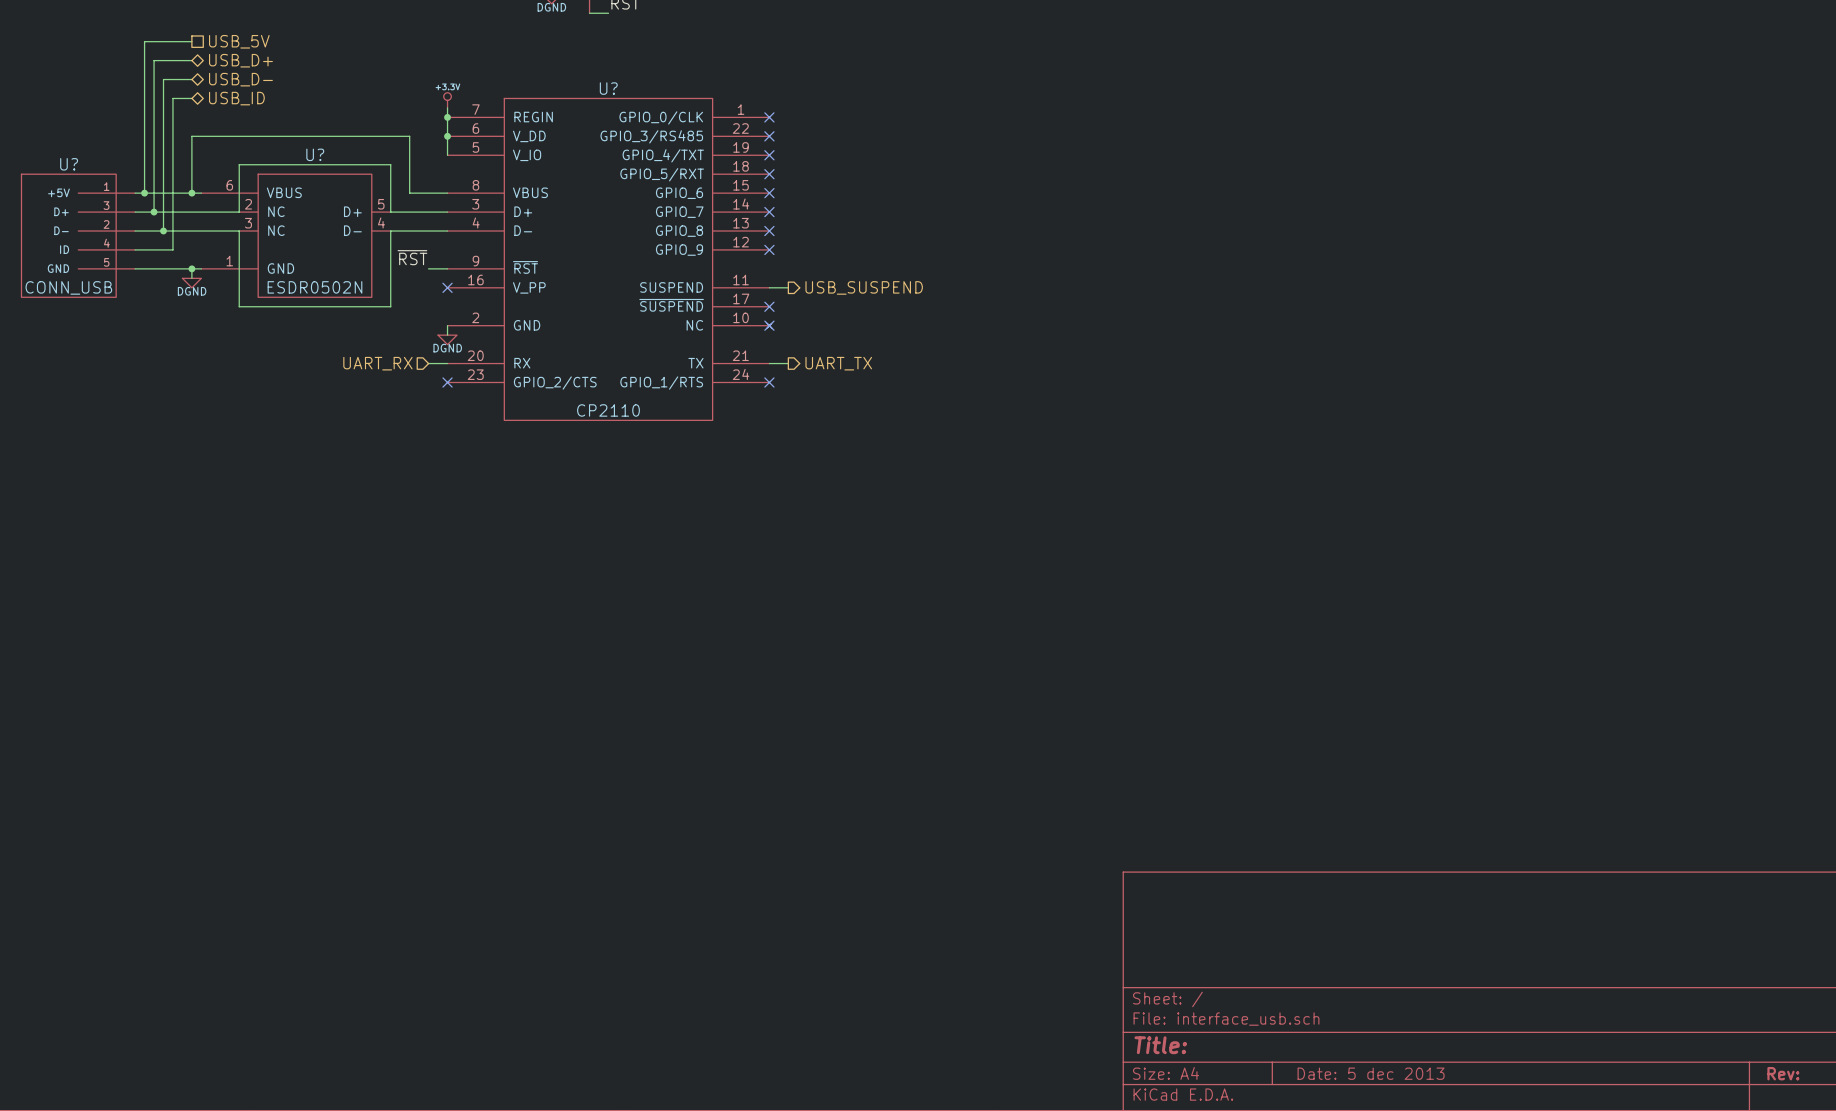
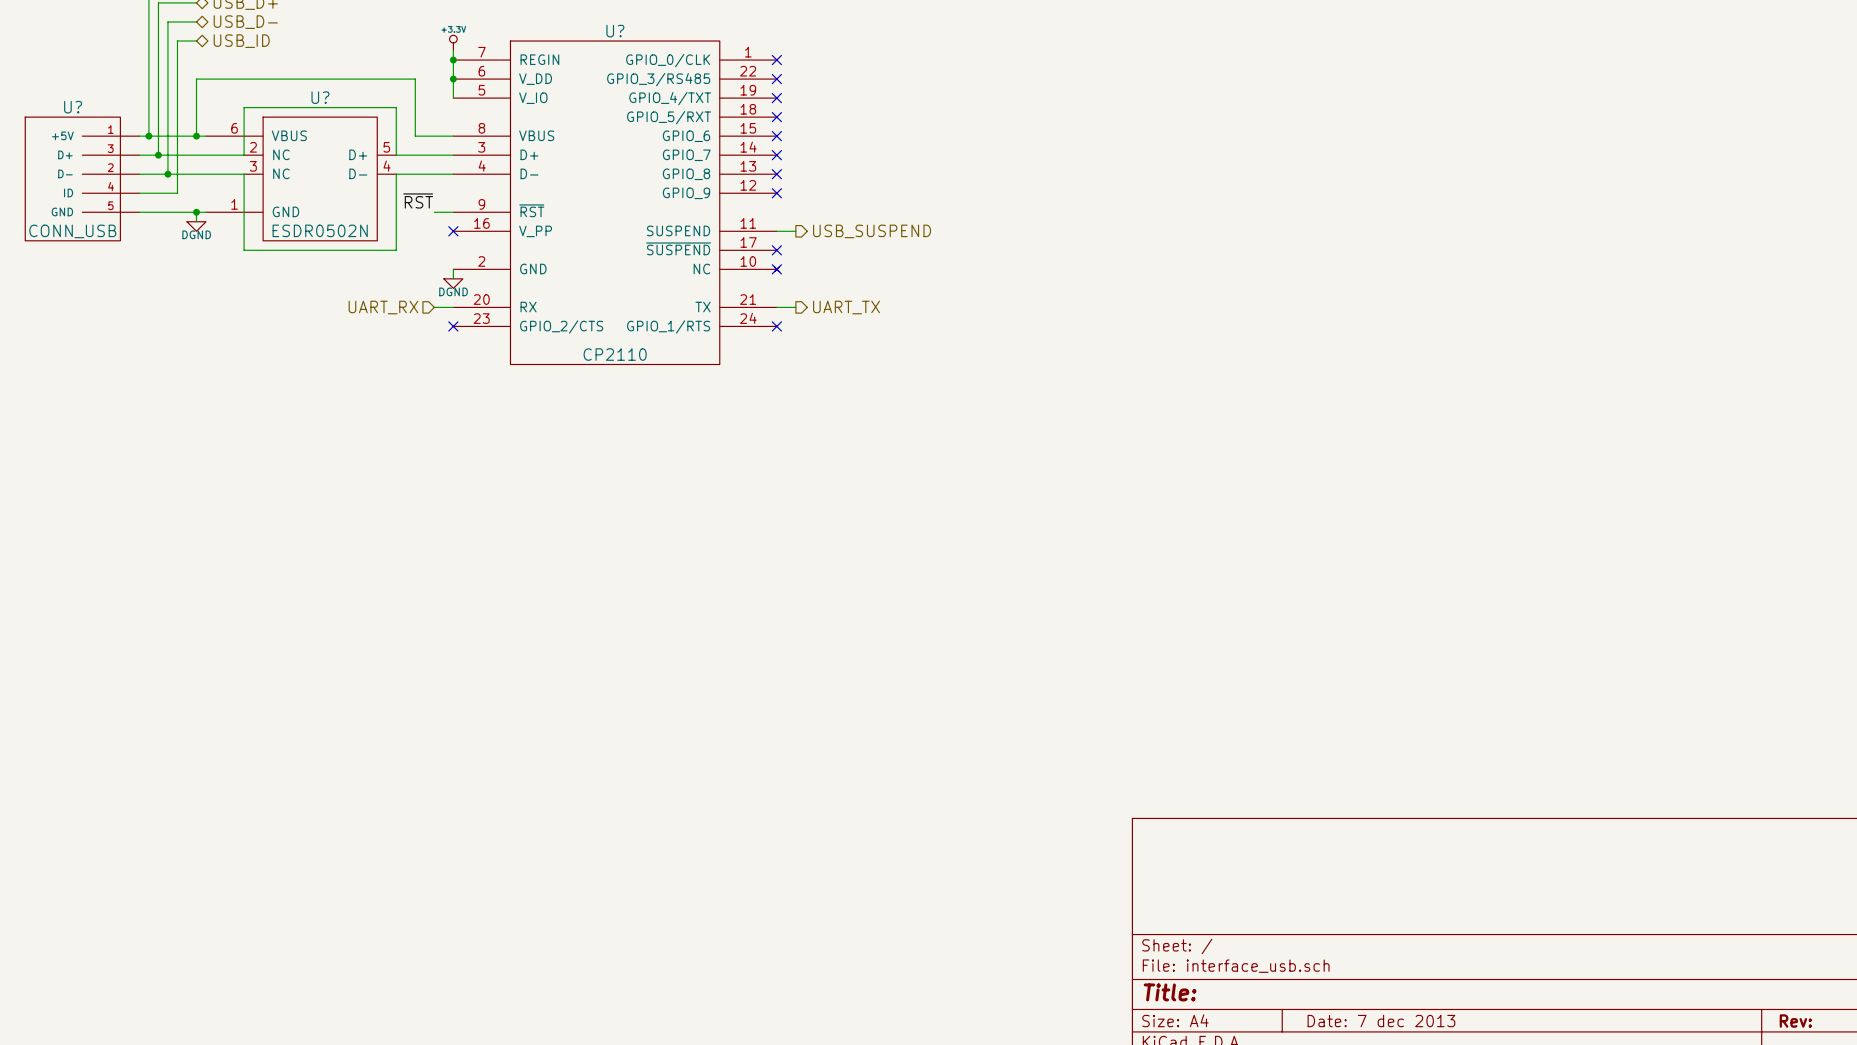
title block: Date: 5 dec 2013 (1371, 1073) -> Date: 7 dec 2013 (1381, 1021)

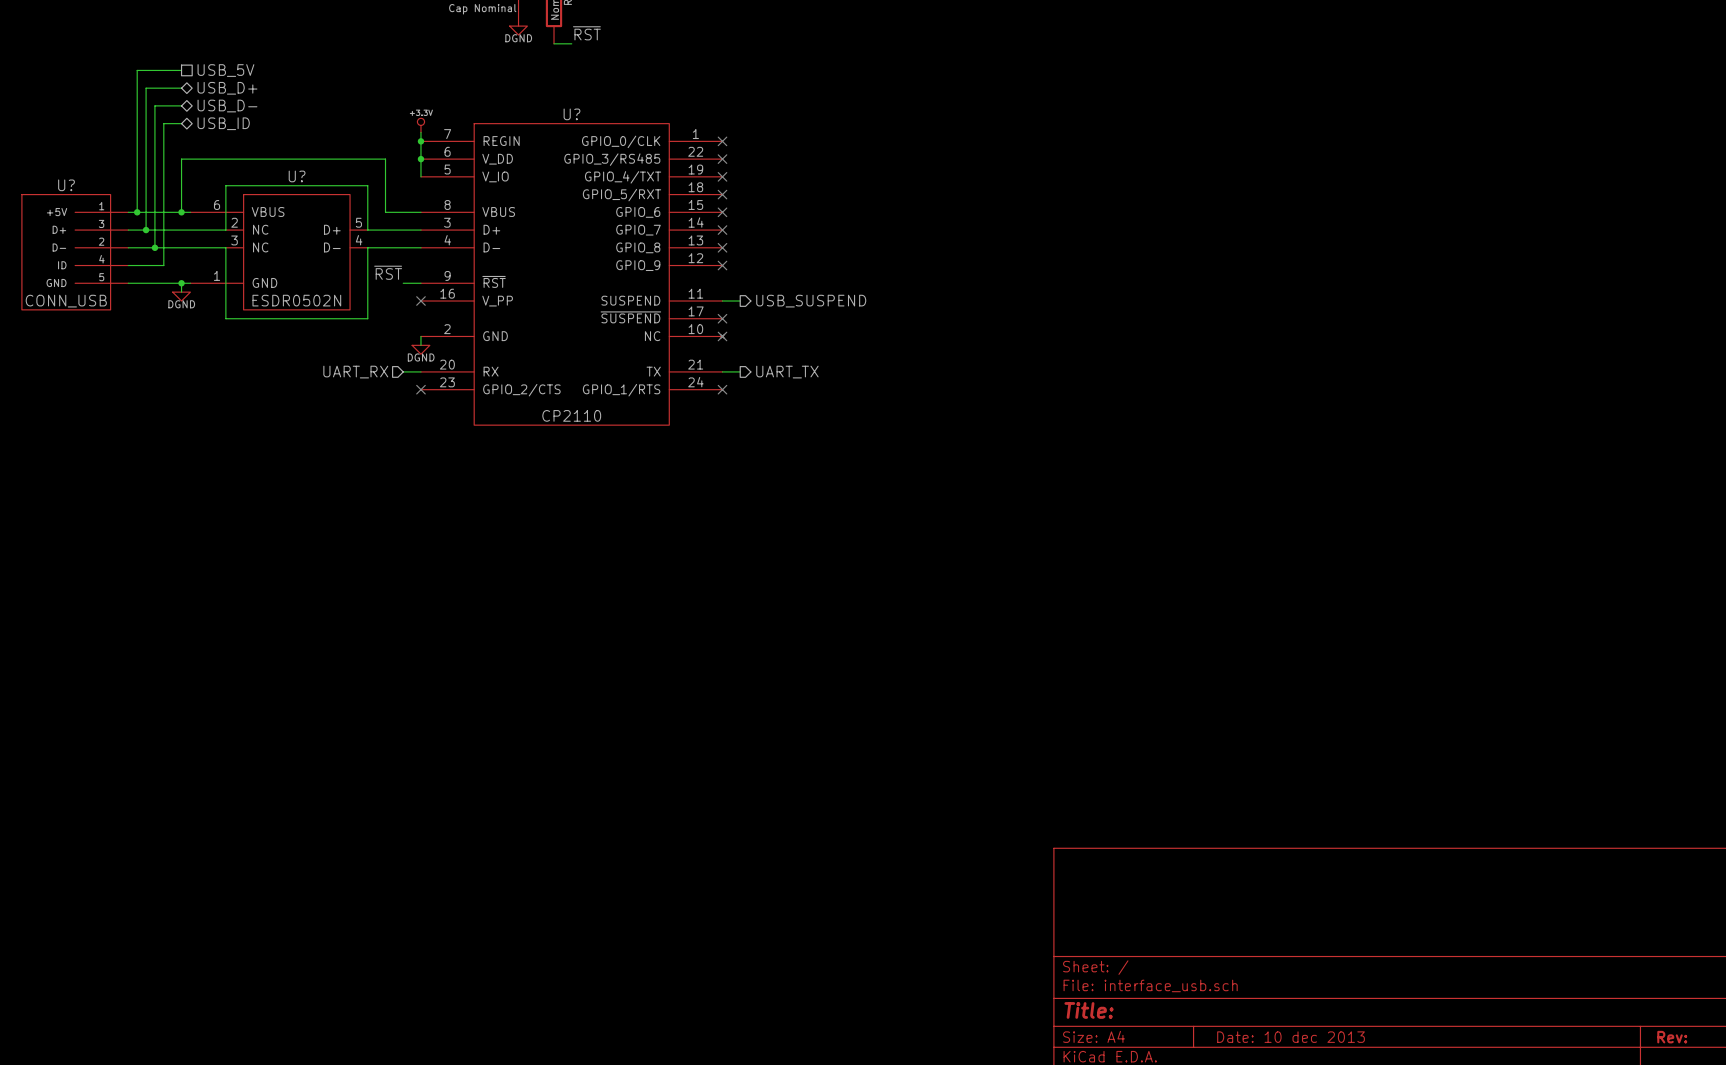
title block: Date: 7 dec 2013 (1381, 1021) -> Date: 10 dec 2013 (1291, 1037)

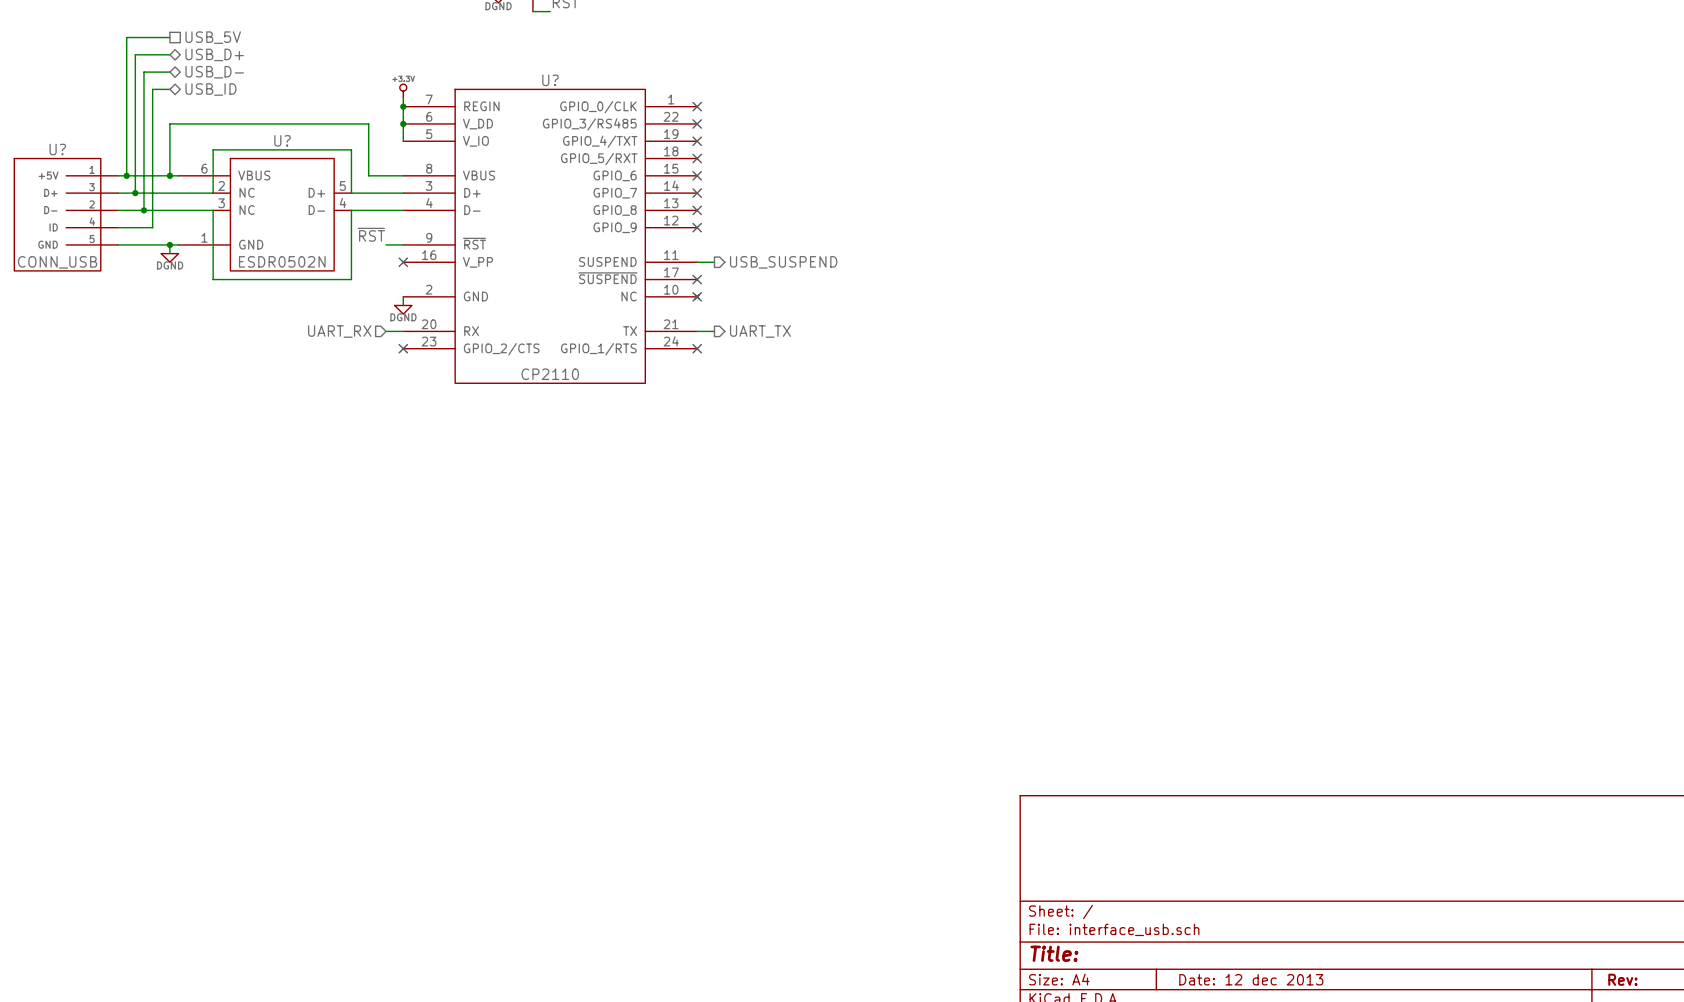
title block: Date: 10 dec 2013 (1291, 1037) -> Date: 12 dec 2013 (1251, 979)

